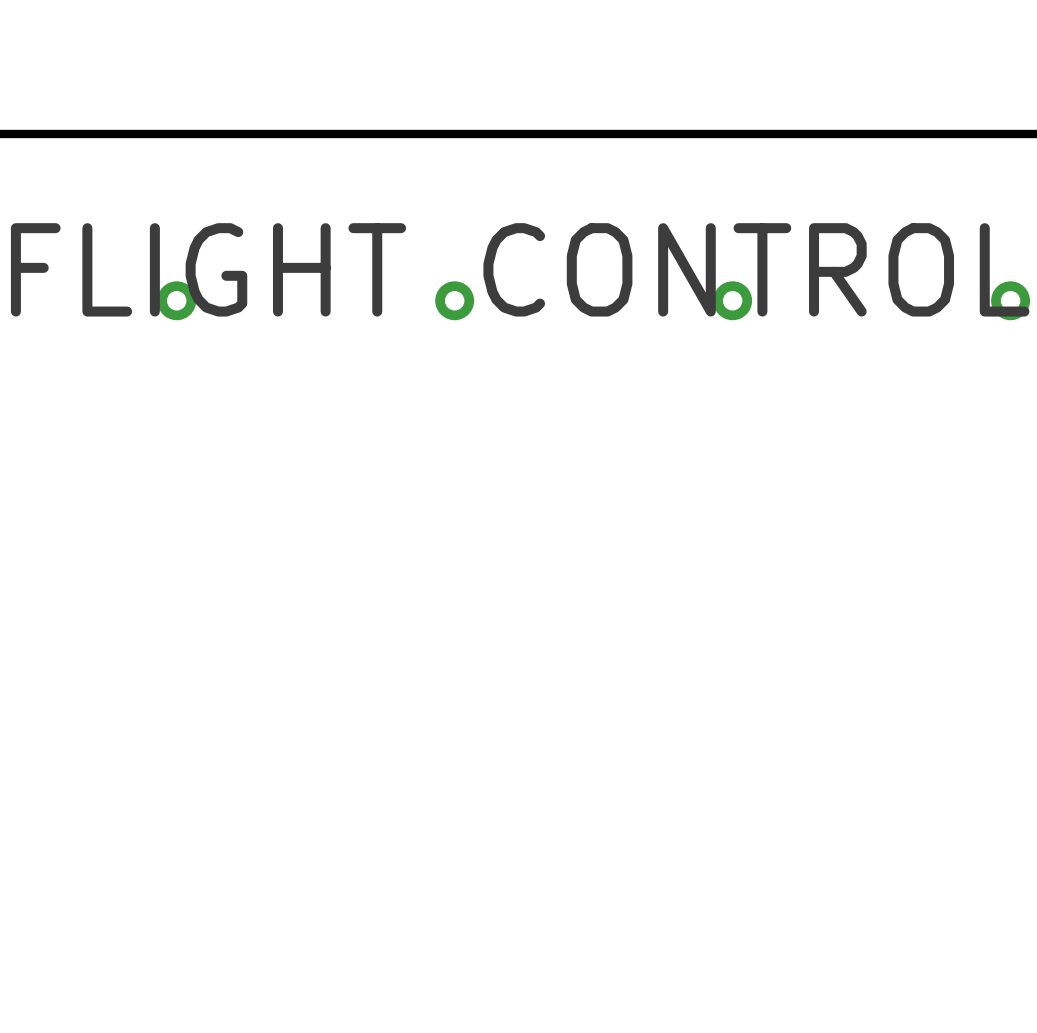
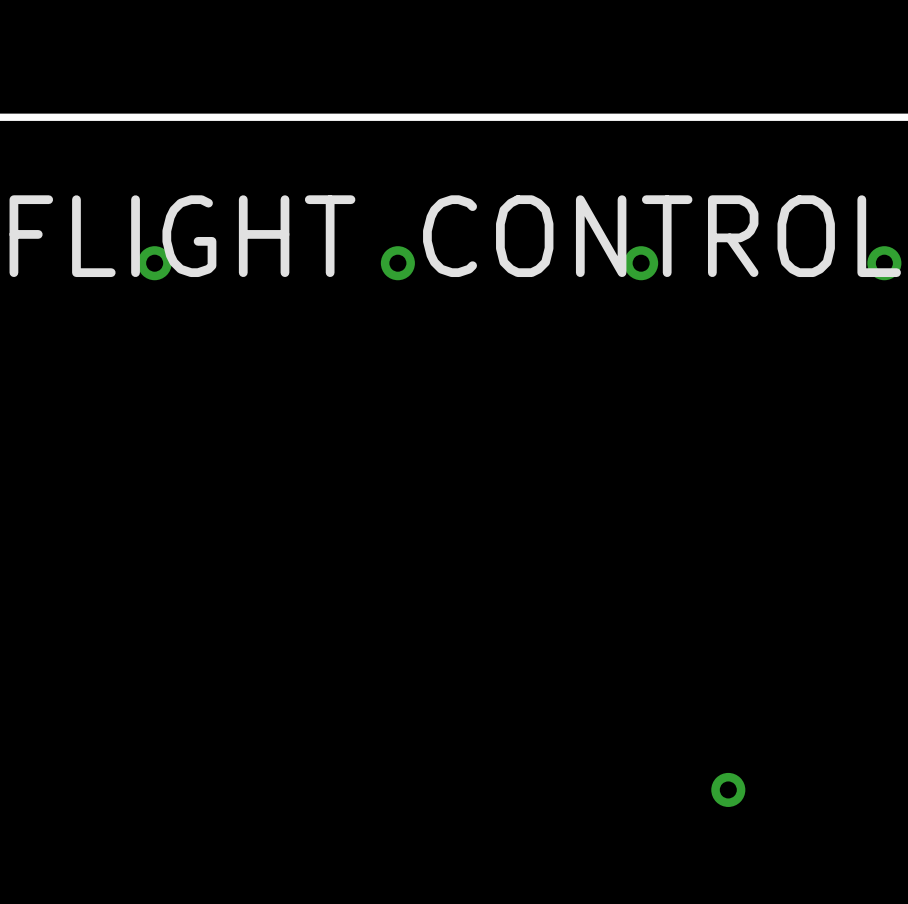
via: none -> (728, 789)

